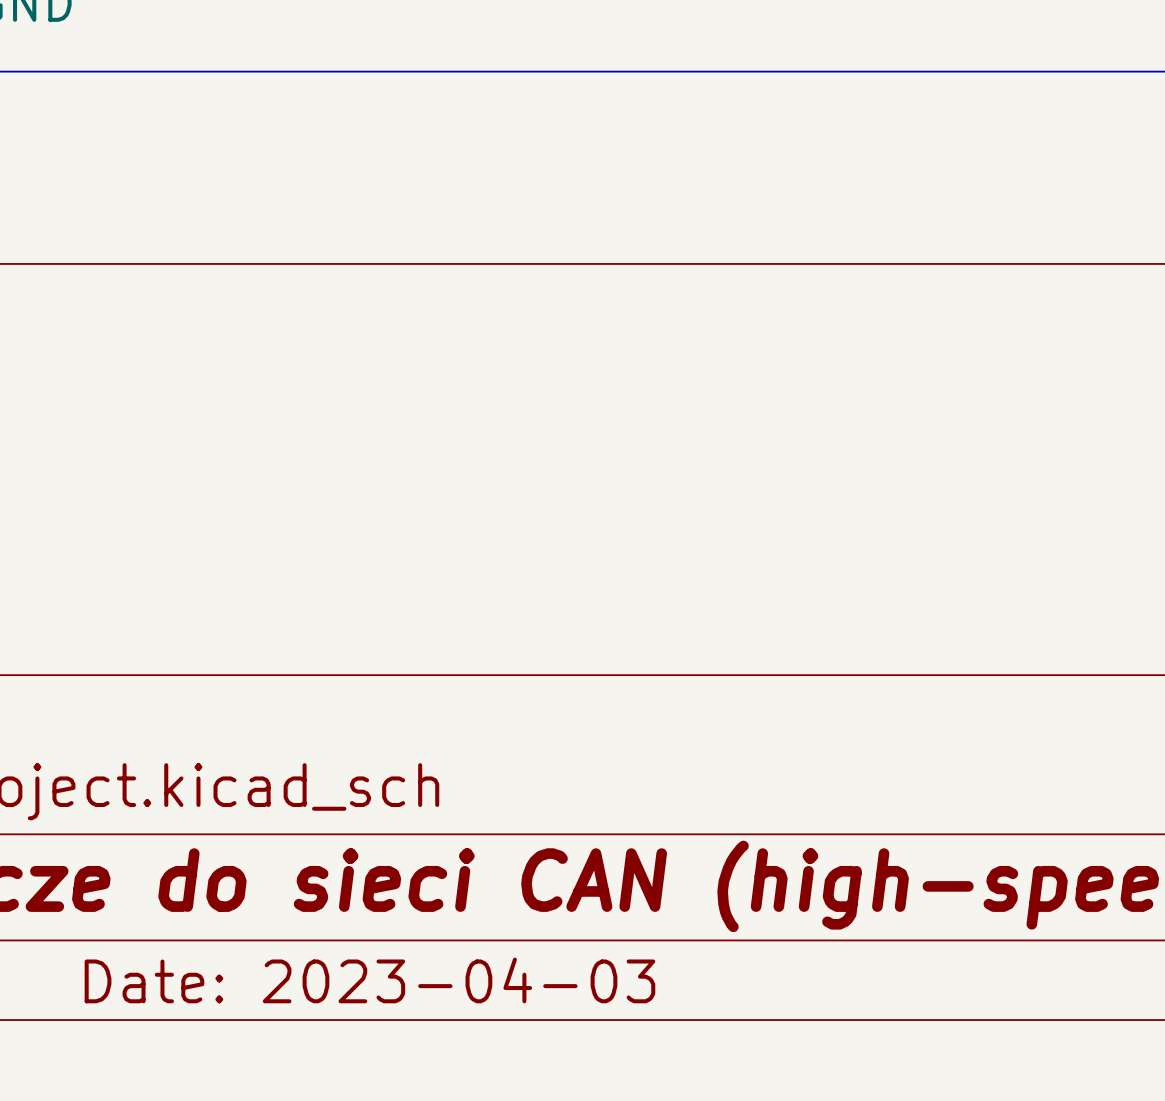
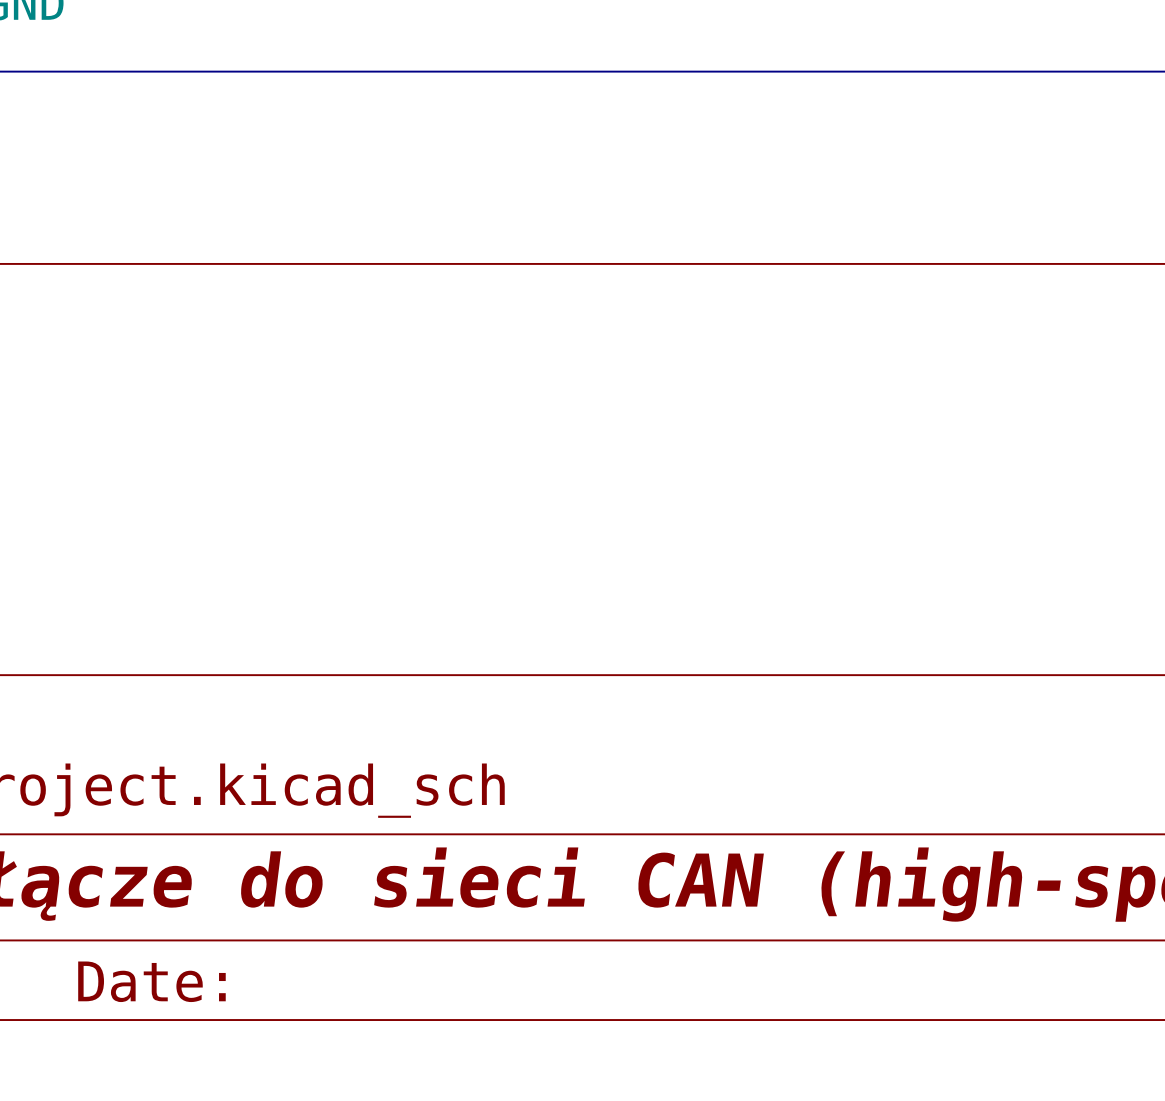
title block: Date: 2023-04-03 (369, 980) -> Date: (151, 981)

